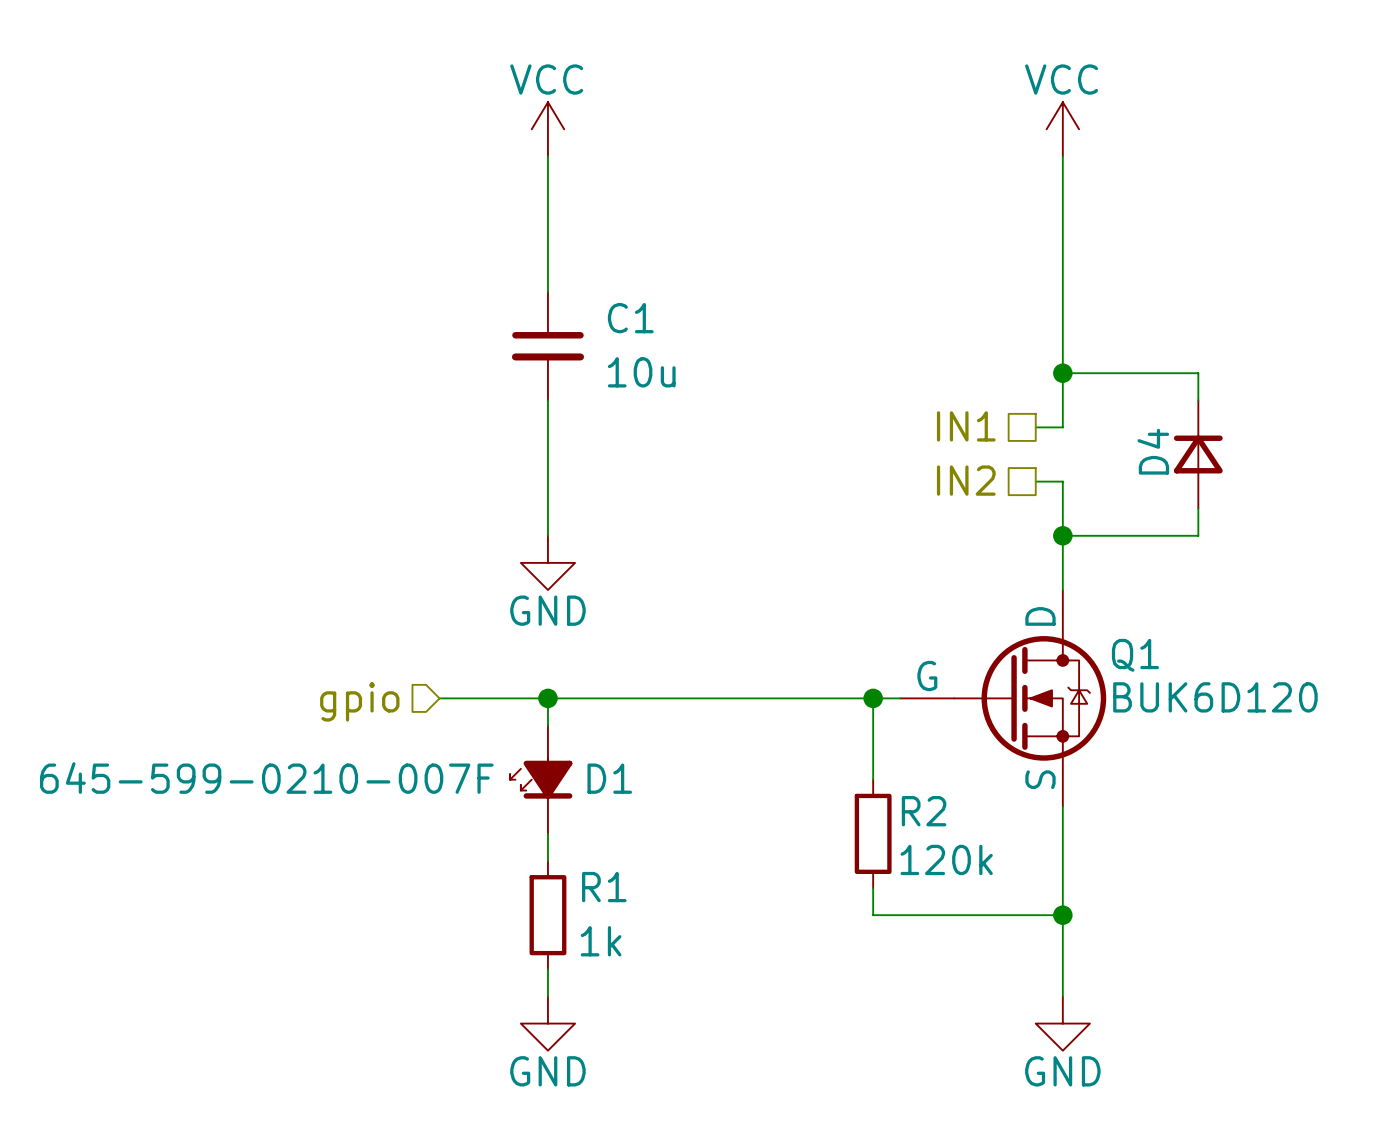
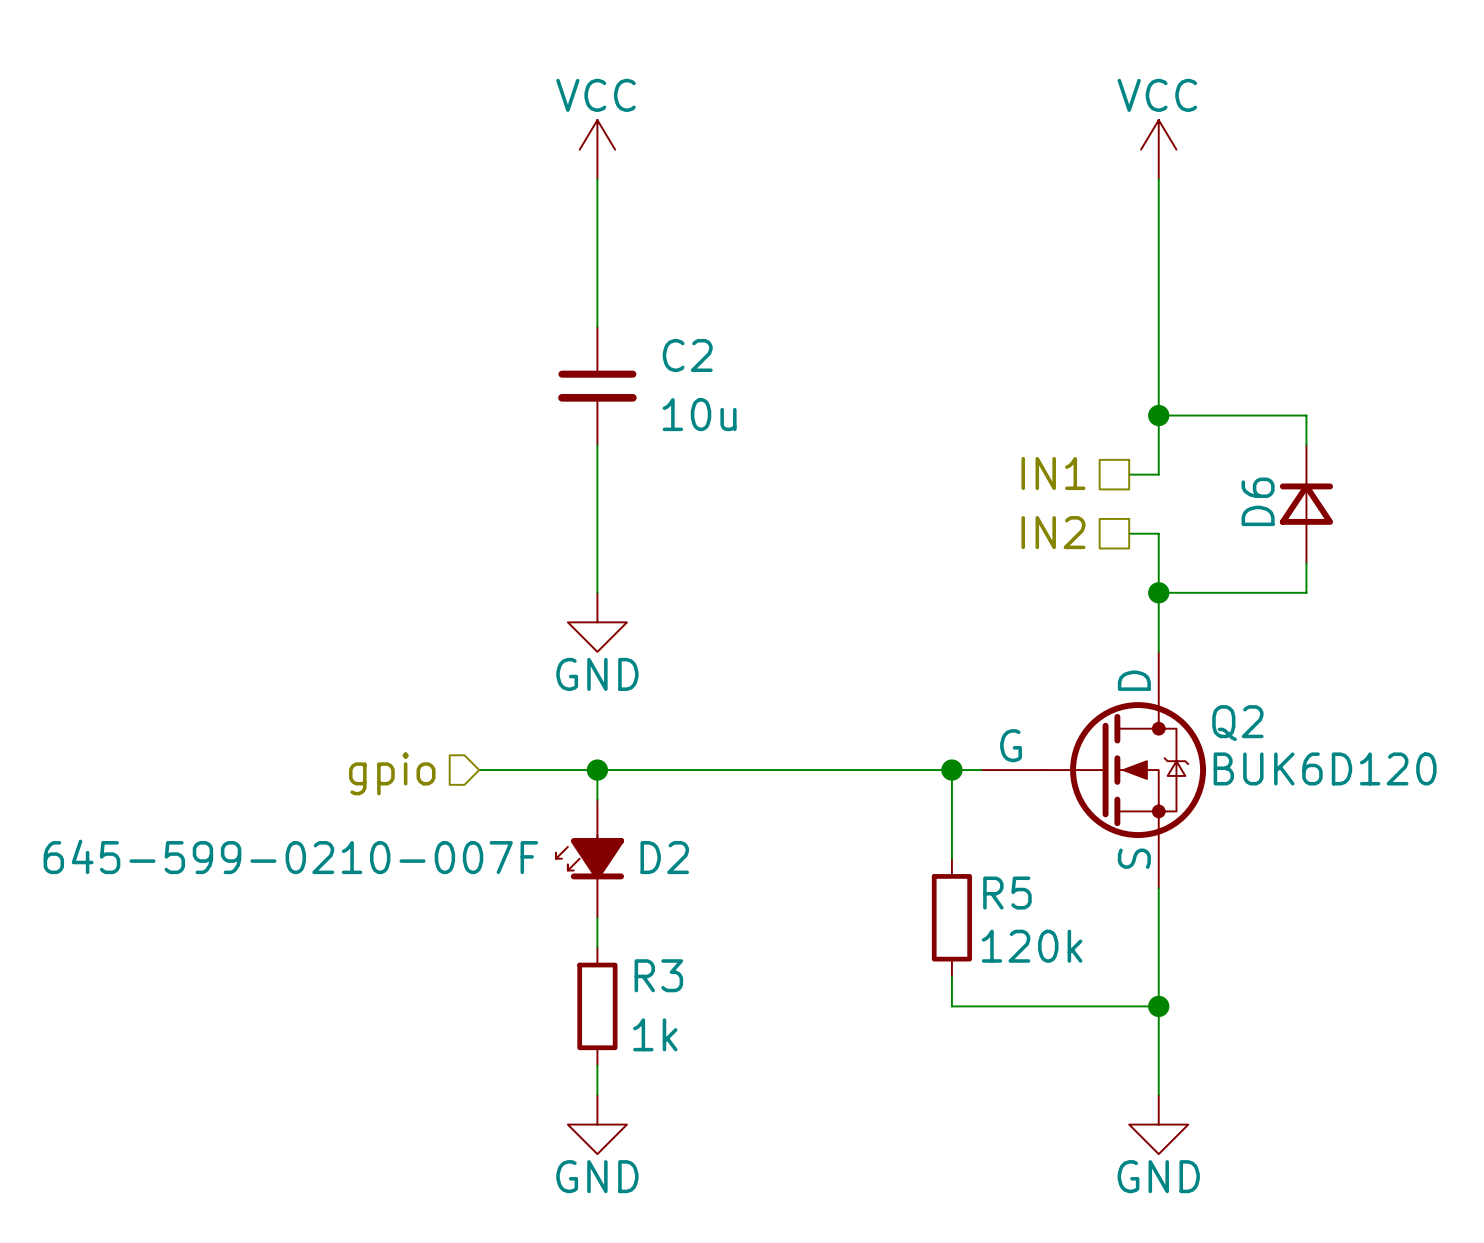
C1 name: C1 (630, 318) -> C2 (687, 355)
D4 name: D4 (1153, 451) -> D6 (1258, 501)
Q1 name: Q1 (1135, 655) -> Q2 (1237, 723)
D1 name: D1 (609, 778) -> D2 (664, 857)
R2 name: R2 (924, 811) -> R5 (1007, 893)
R1 name: R1 (604, 887) -> R3 (658, 975)

